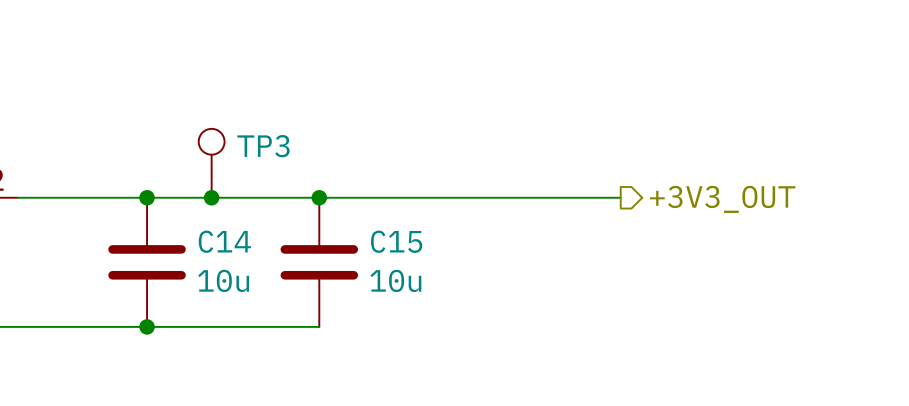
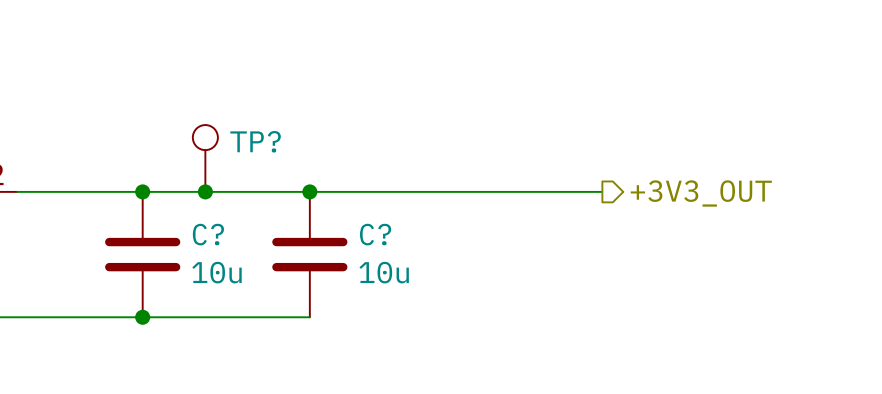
TP3 name: TP3 (263, 146) -> TP? (255, 141)
C14 name: C14 (224, 241) -> C? (208, 234)
C15 name: C15 (396, 241) -> C? (375, 234)

